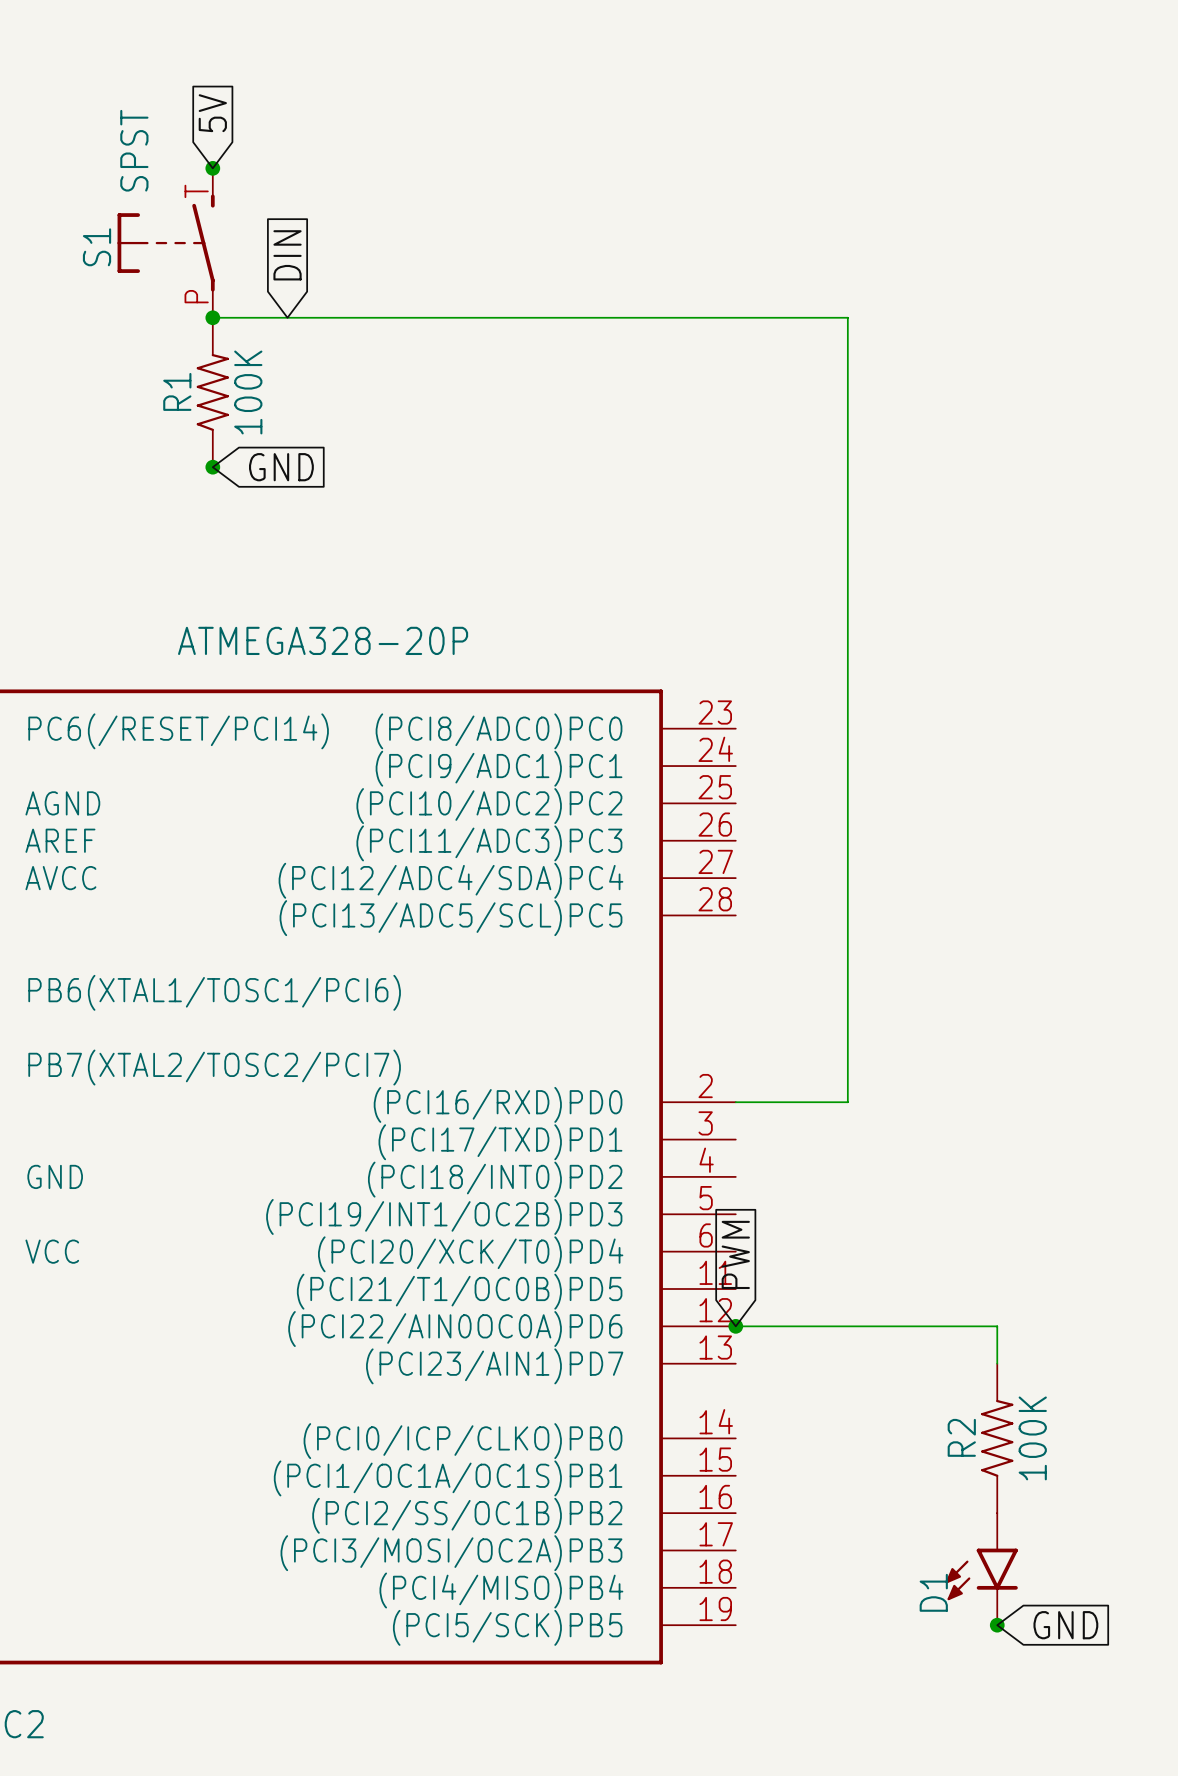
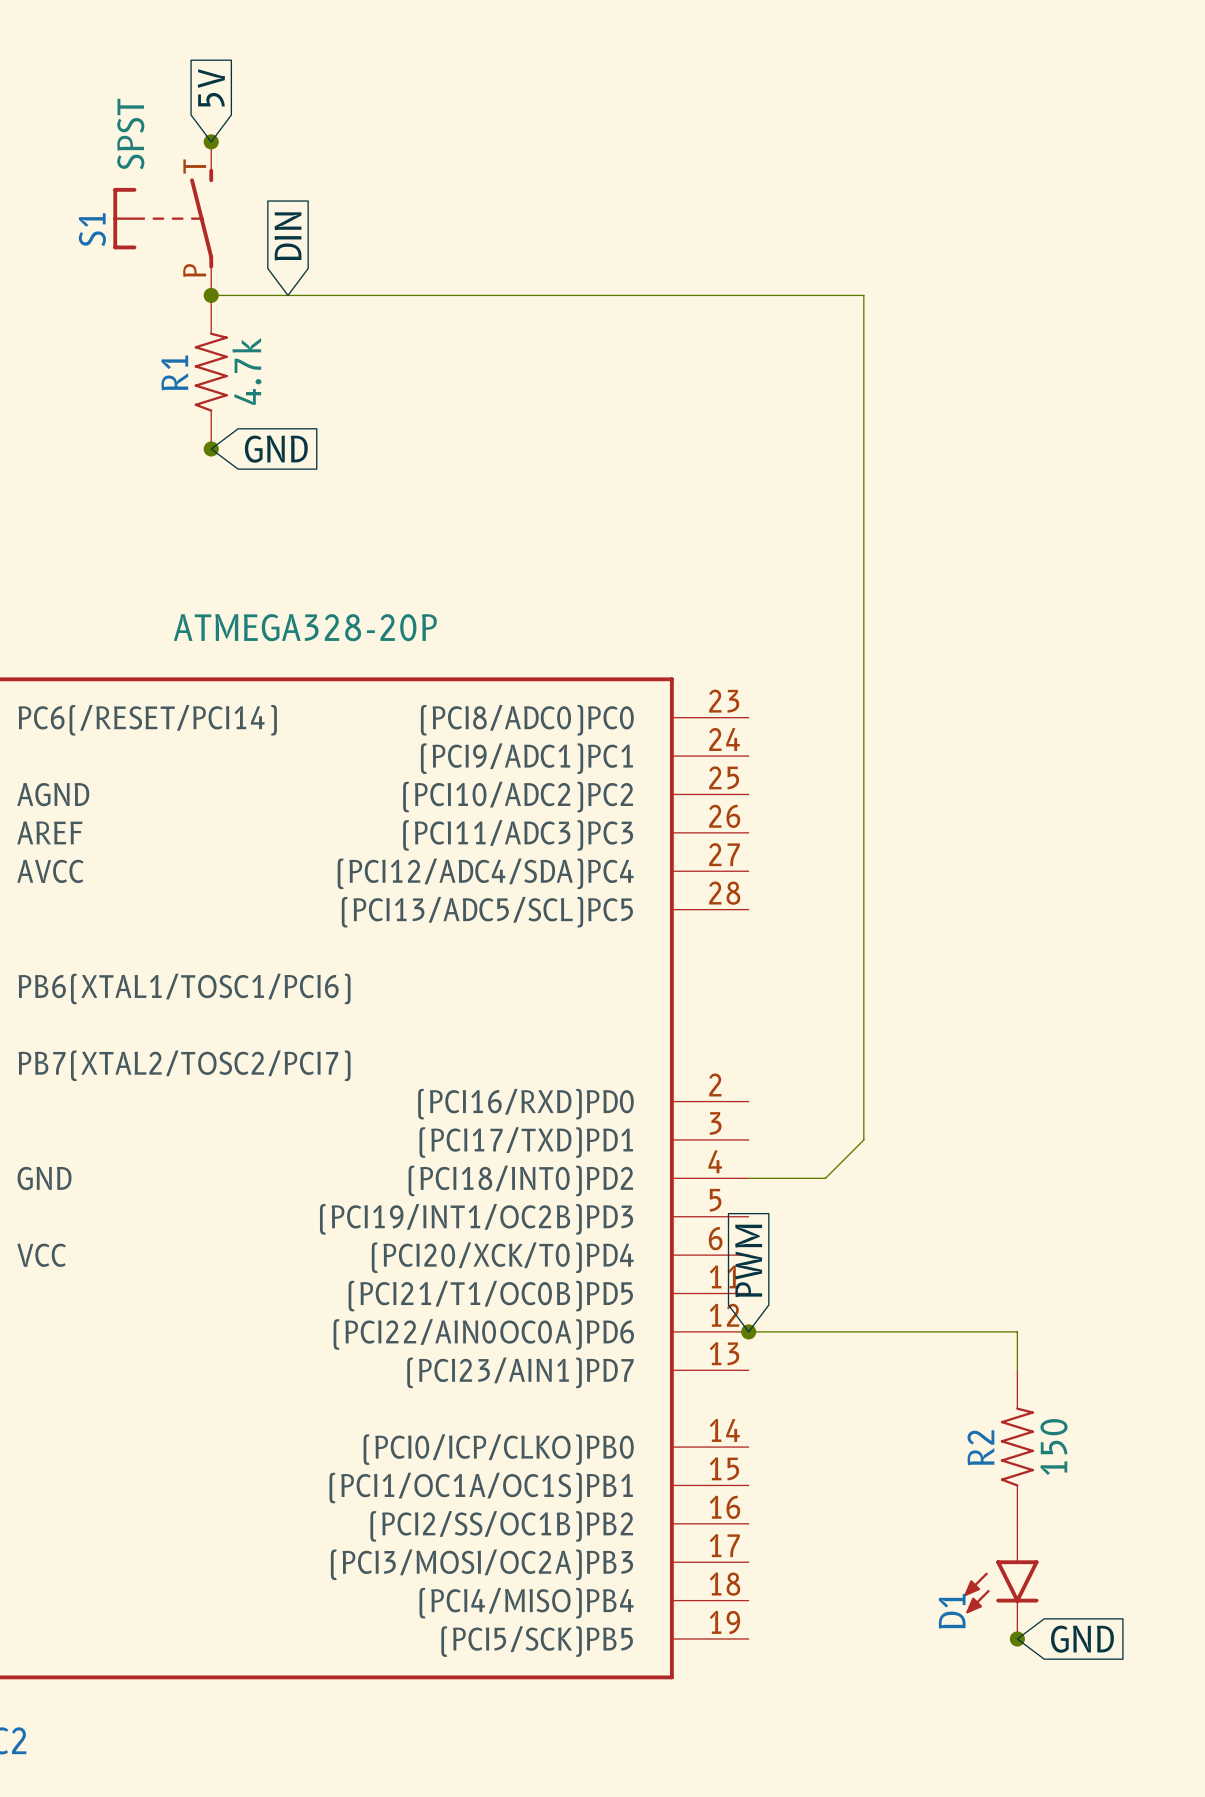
R1 value: 100K (248, 392) -> 4.7k (246, 371)
wire: (735, 1102) (847, 1102) -> (748, 1178) (825, 1178) (863, 1139) (863, 1101)
R2 value: 100K (1032, 1438) -> 150 (1053, 1447)

